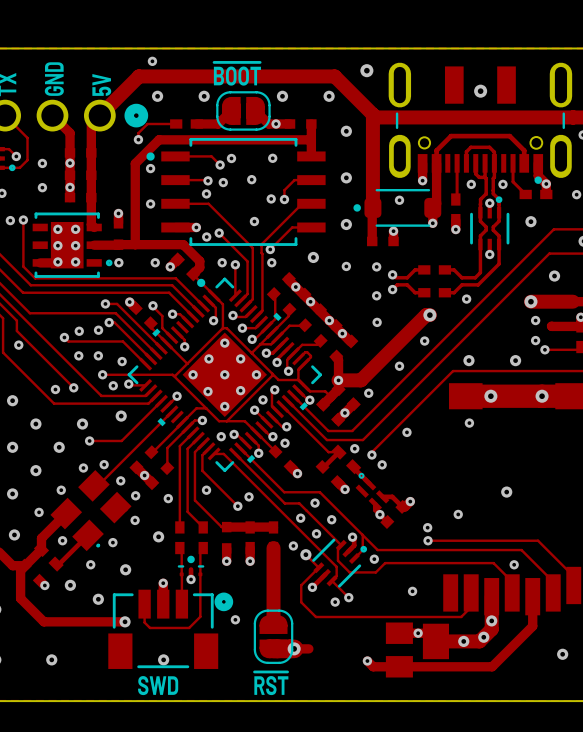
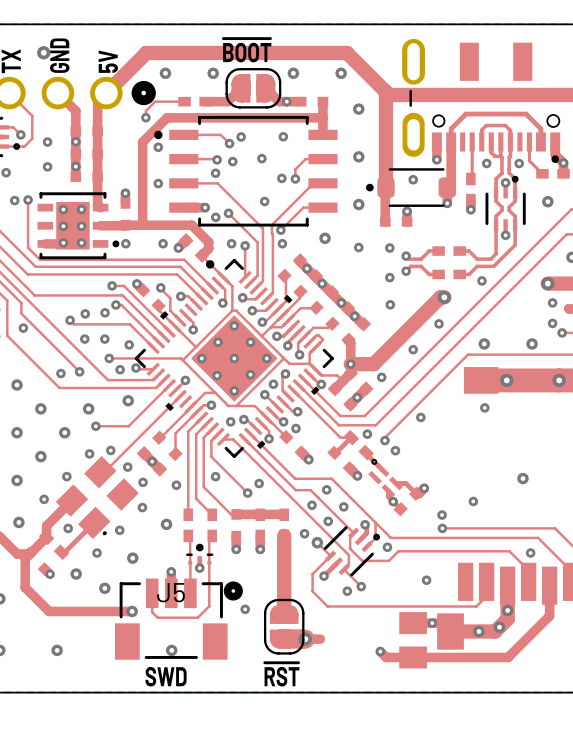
via: (152, 61) -> none
via: (366, 70) -> none
via: none -> (43, 52)
via: (480, 91) -> none
J5 name: none -> J5 (171, 592)

